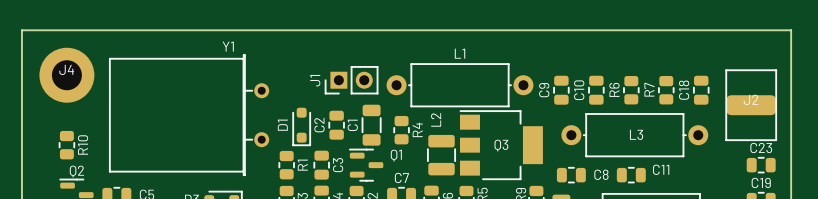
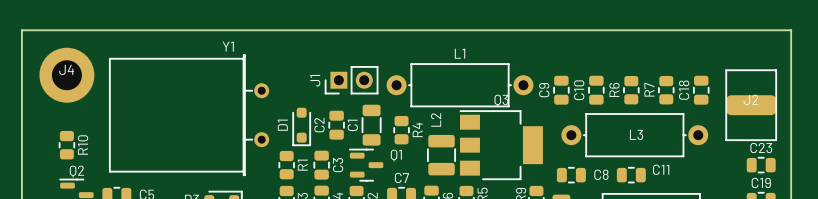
Q3 name position: Q3 (501, 145) -> Q3 (501, 100)

